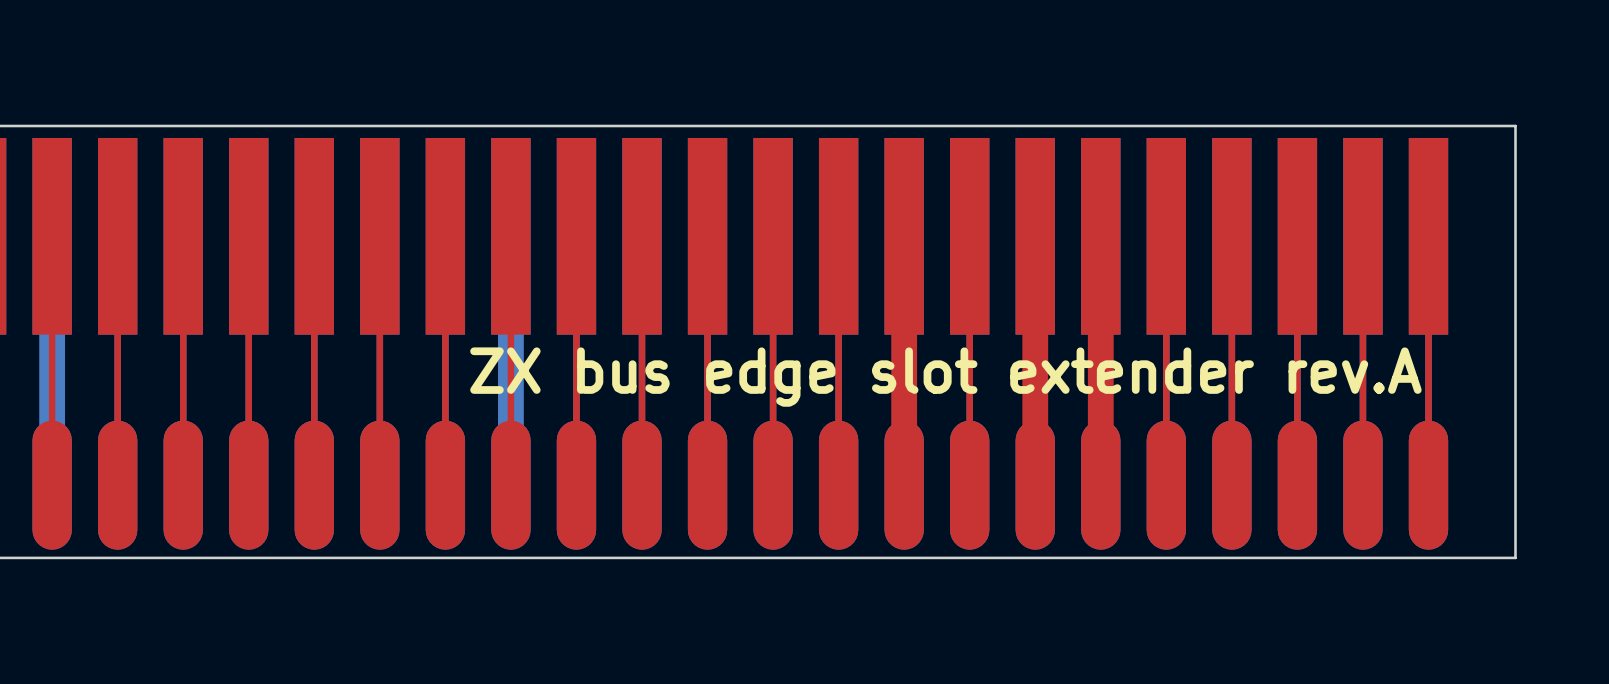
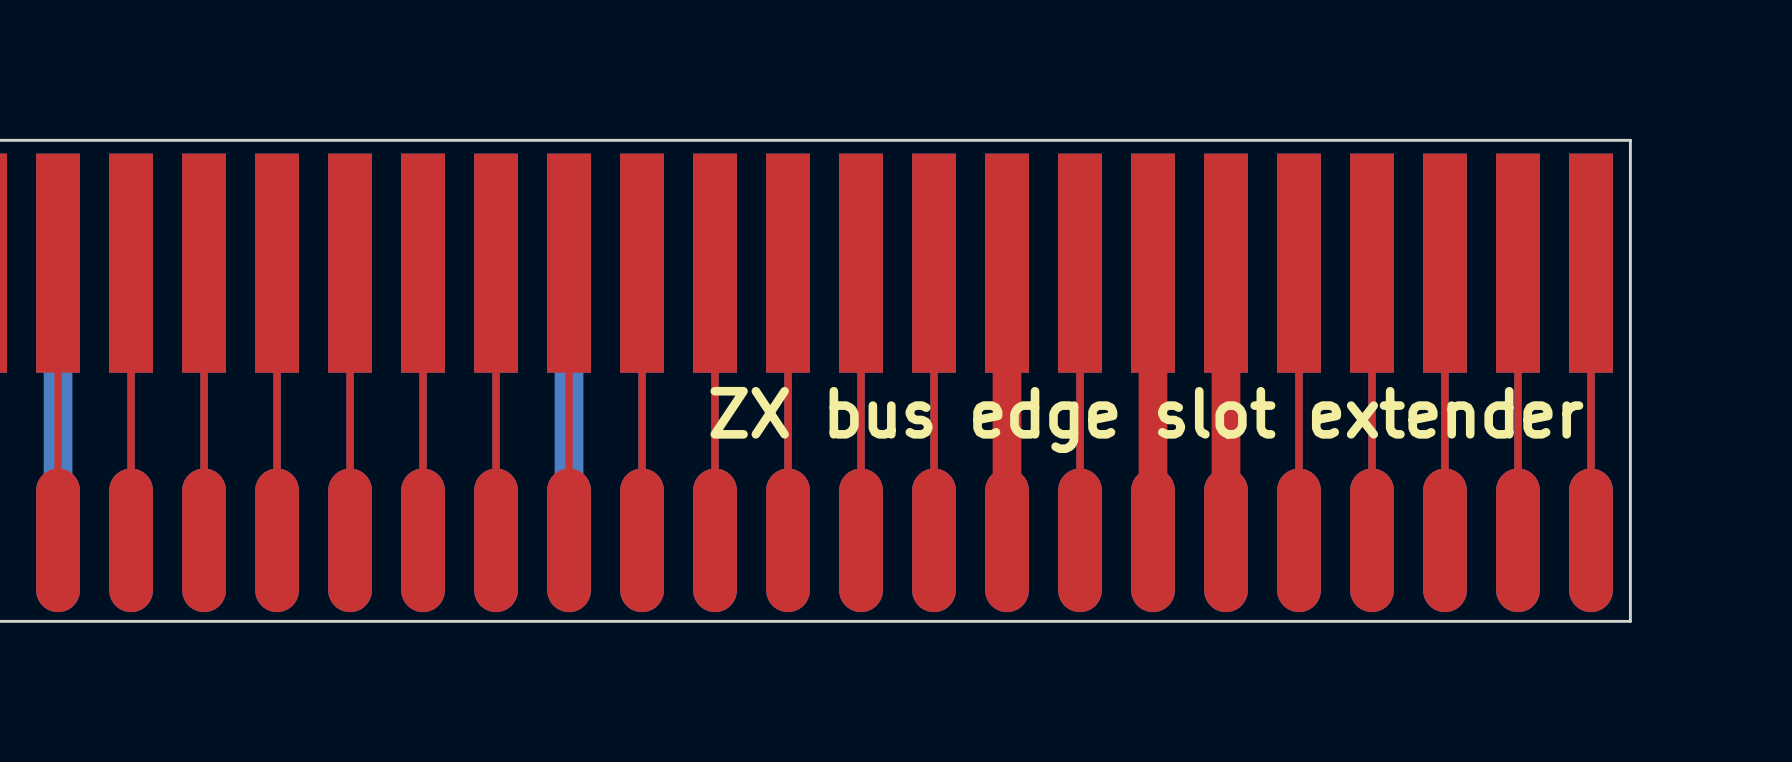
board edge: (1463, 125) (1515, 125) (1515, 557) (1463, 557) -> (1630, 140) (1630, 621)
text: ZX bus edge slot extender rev.A (945, 377) -> ZX bus edge slot extender (1146, 419)

